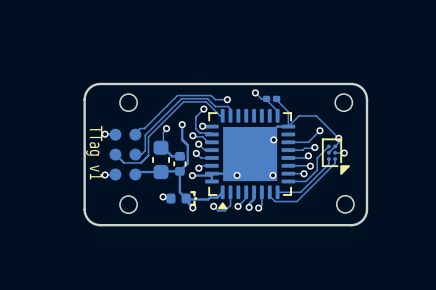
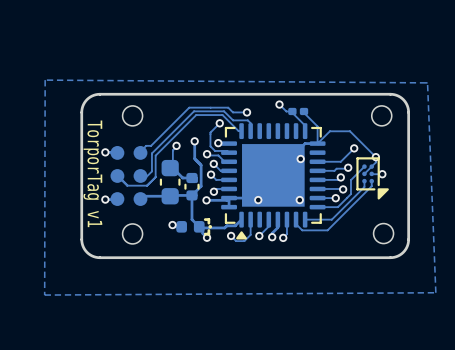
zone outline: none -> (45, 80) (427, 82) (435, 292) (44, 295) (45, 80)
text: TTag v1 (94, 152) -> TorporTag v1 (92, 173)

